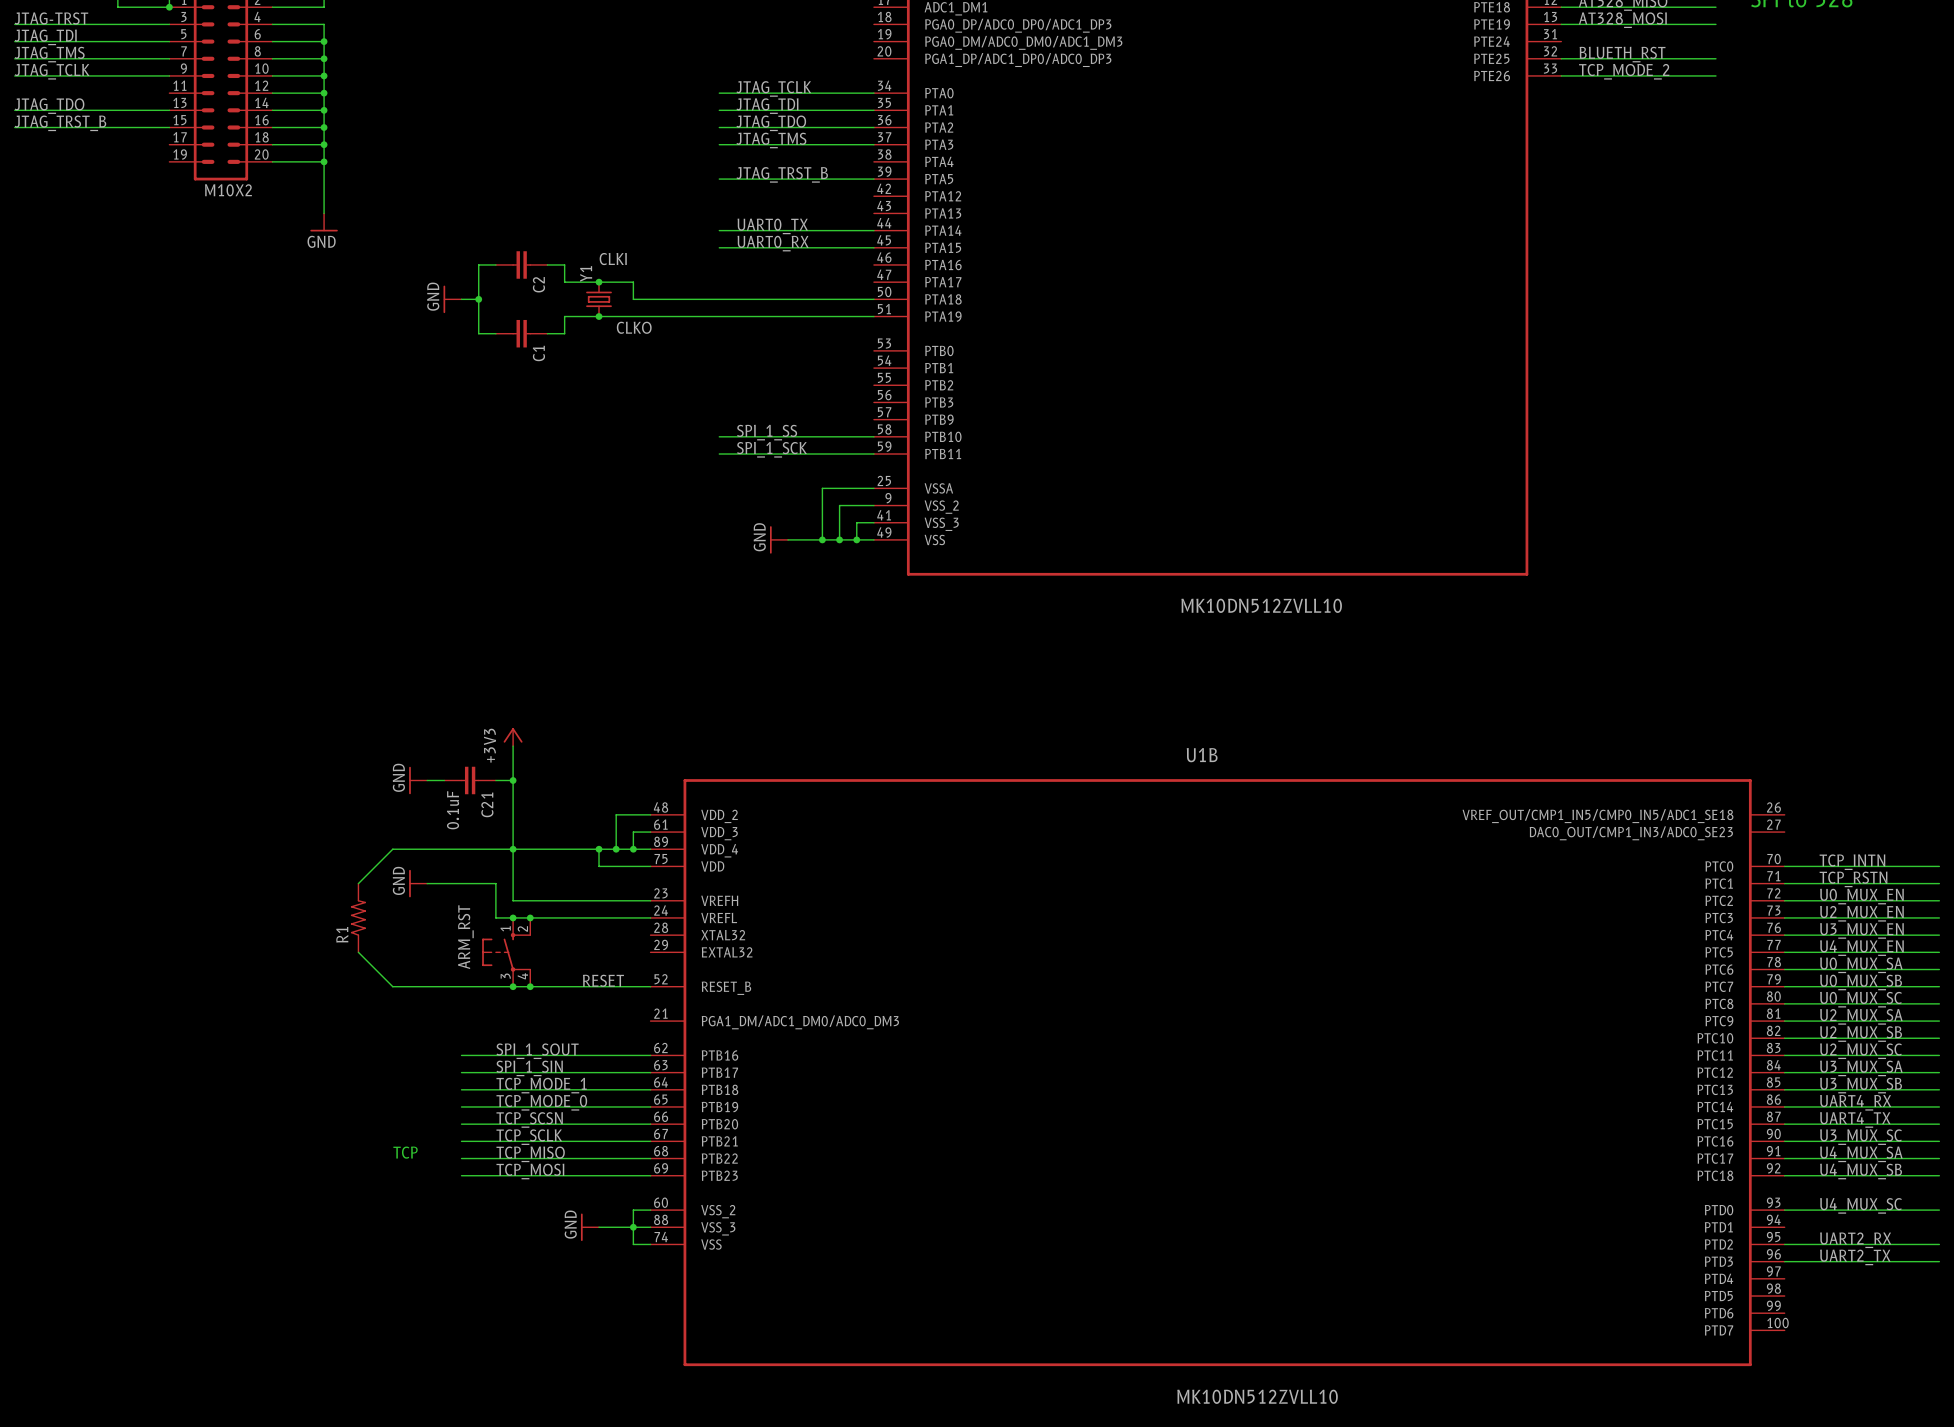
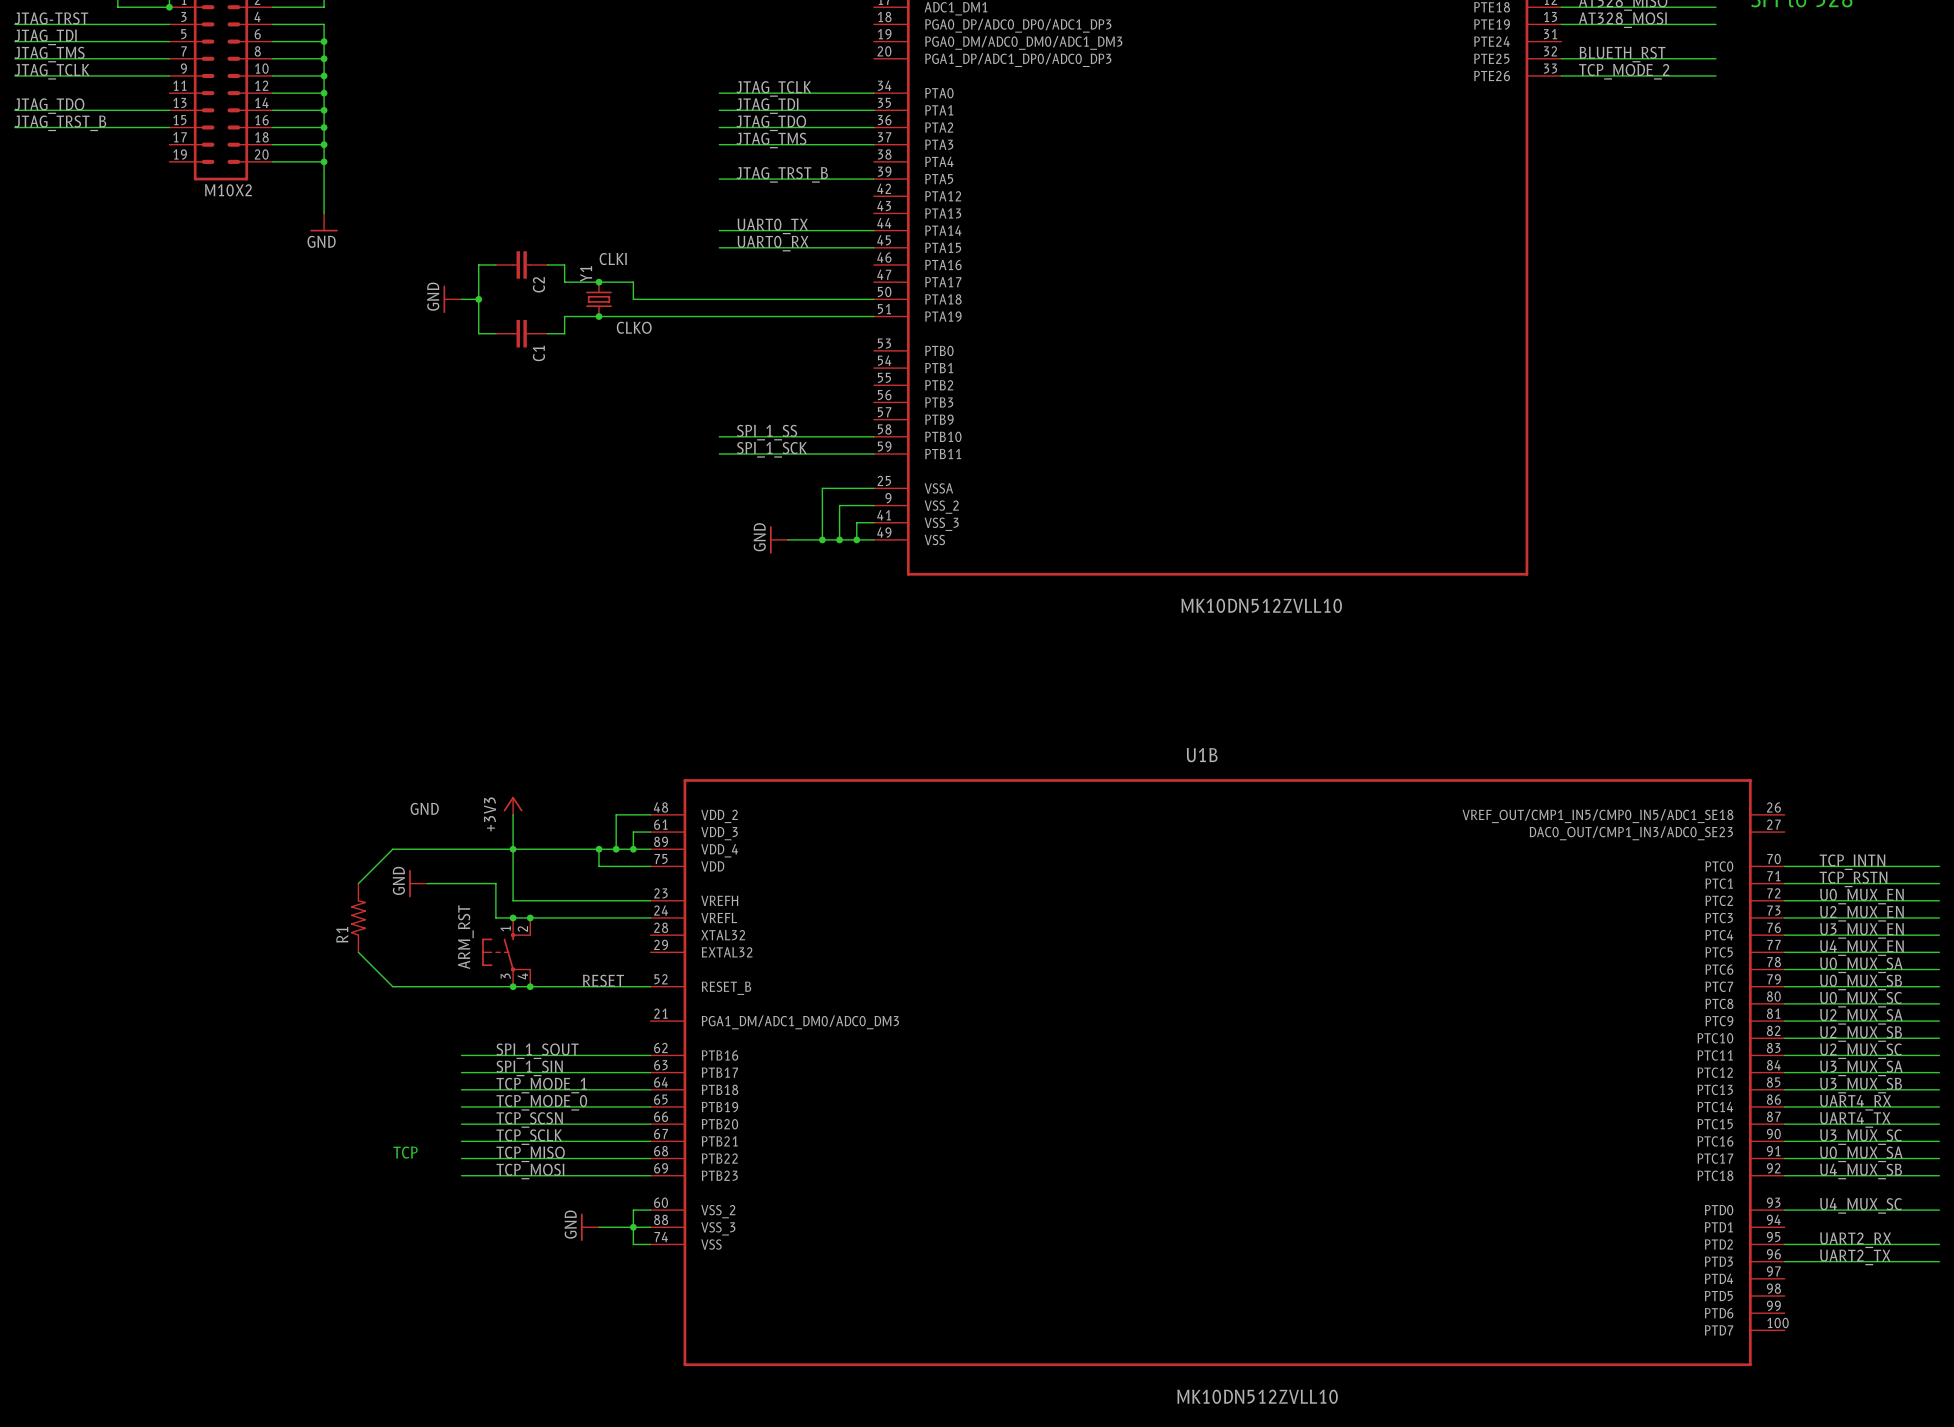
power symbol position: +3V3 (513, 737) -> +3V3 (513, 805)
wire: (513, 746) (513, 814) -> none
power symbol: GND (418, 780) -> none
wire: (427, 780) (444, 780) -> none
C21: 0.1uF (470, 780) -> none
wire: (495, 780) (513, 780) -> none
junction: (513, 780) -> none
label: none -> GND (424, 808)
label: U4_MUX_SA (1861, 1154) -> U0_MUX_SA (1861, 1154)

